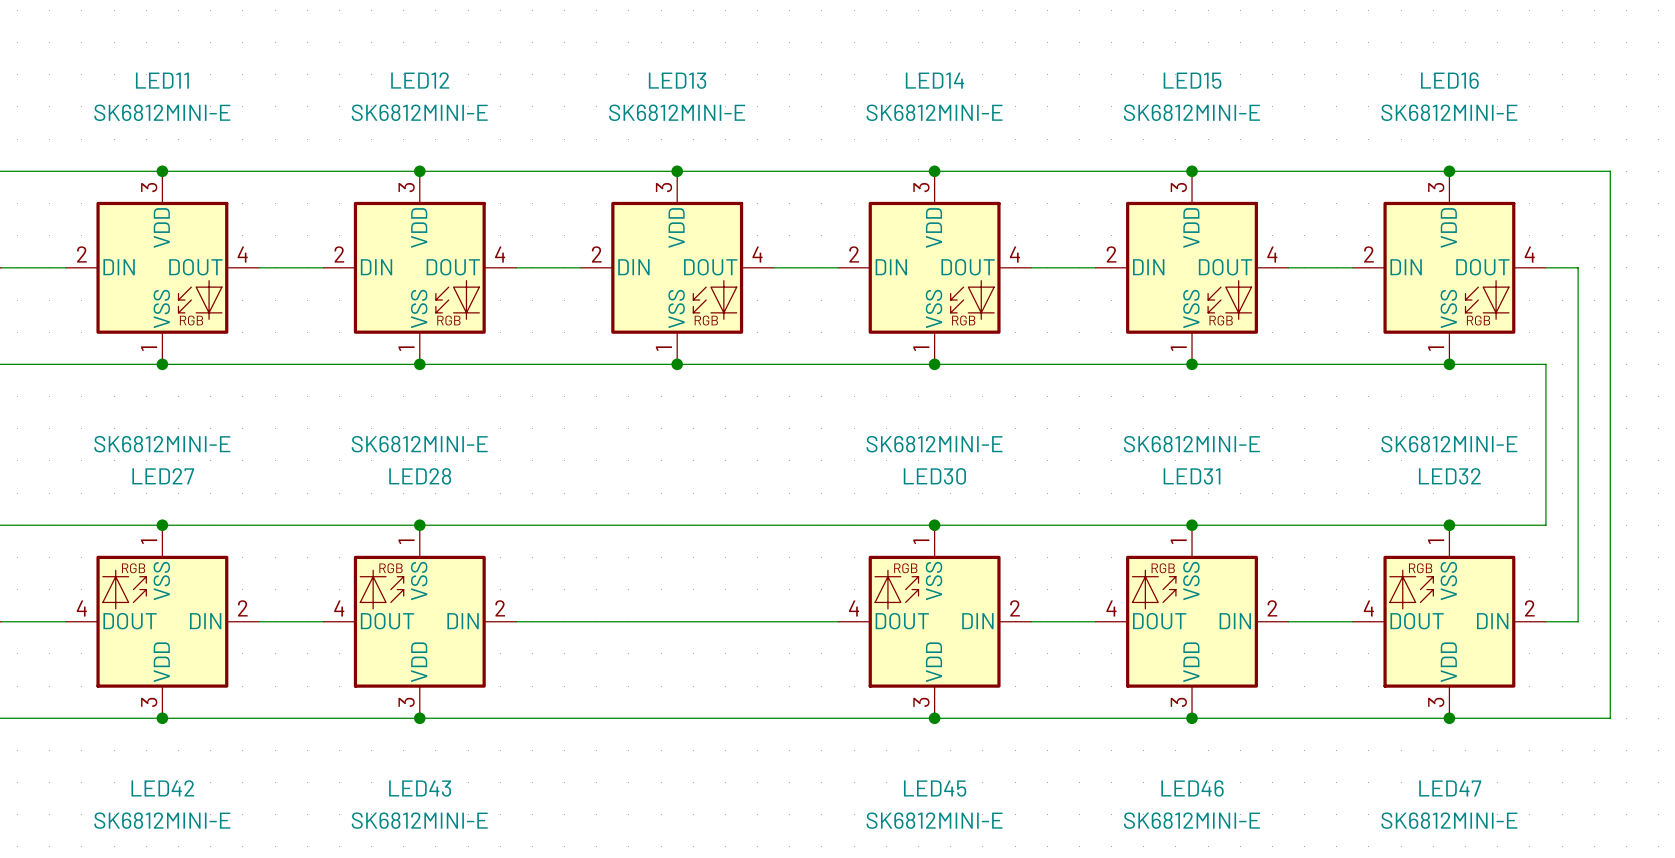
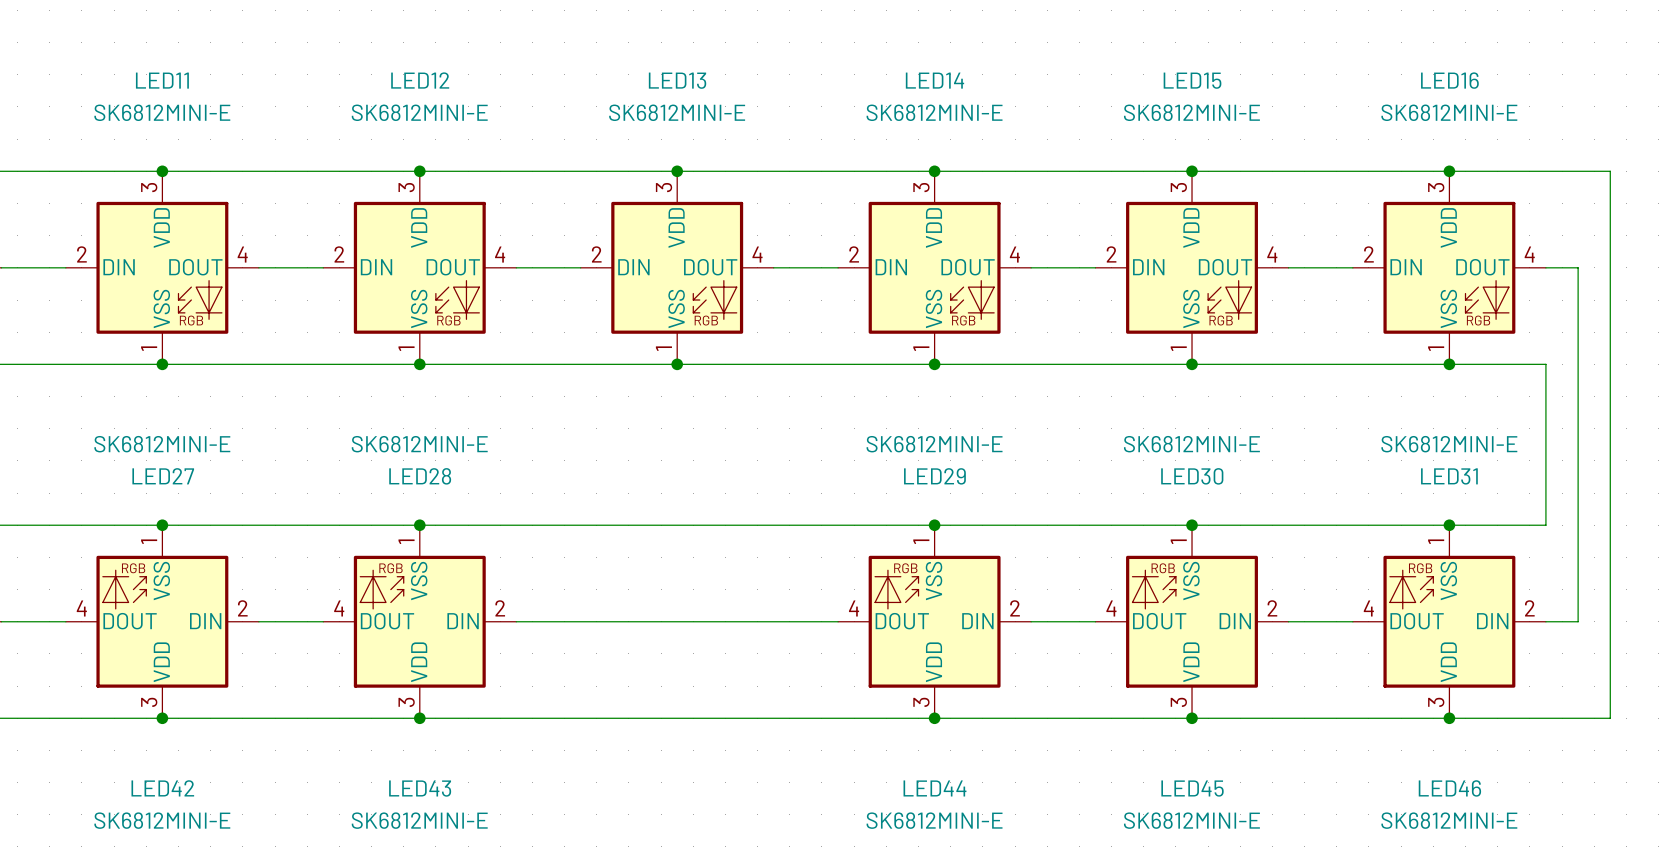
LED30 name: LED30 (934, 476) -> LED29 (934, 476)
LED31 name: LED31 (1192, 476) -> LED30 (1192, 476)
LED32 name: LED32 (1449, 476) -> LED31 (1449, 476)
LED45 name: LED45 (935, 788) -> LED44 (934, 788)
LED46 name: LED46 (1192, 788) -> LED45 (1192, 788)
LED47 name: LED47 (1450, 788) -> LED46 (1449, 788)

